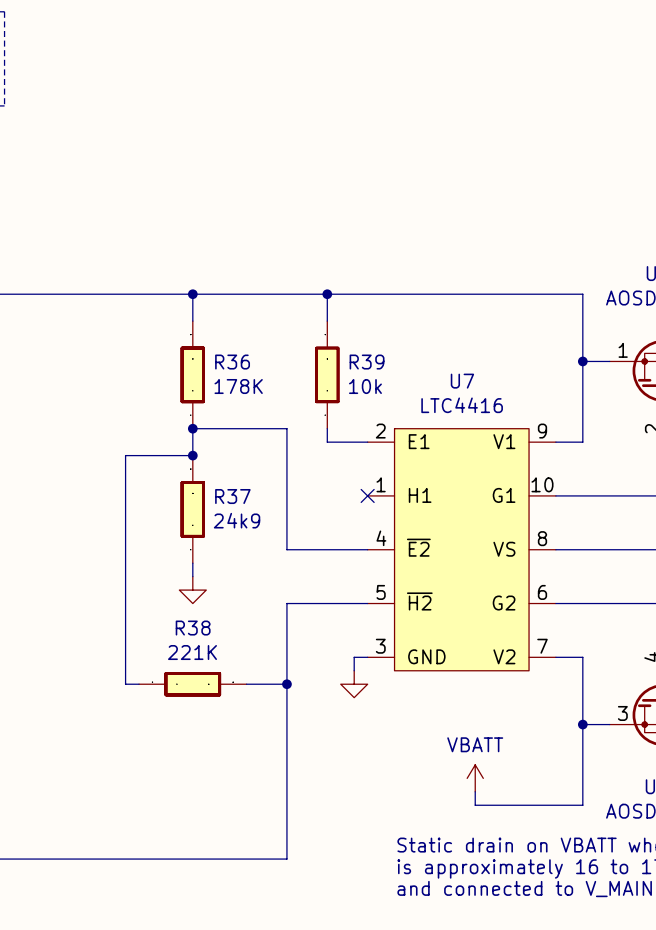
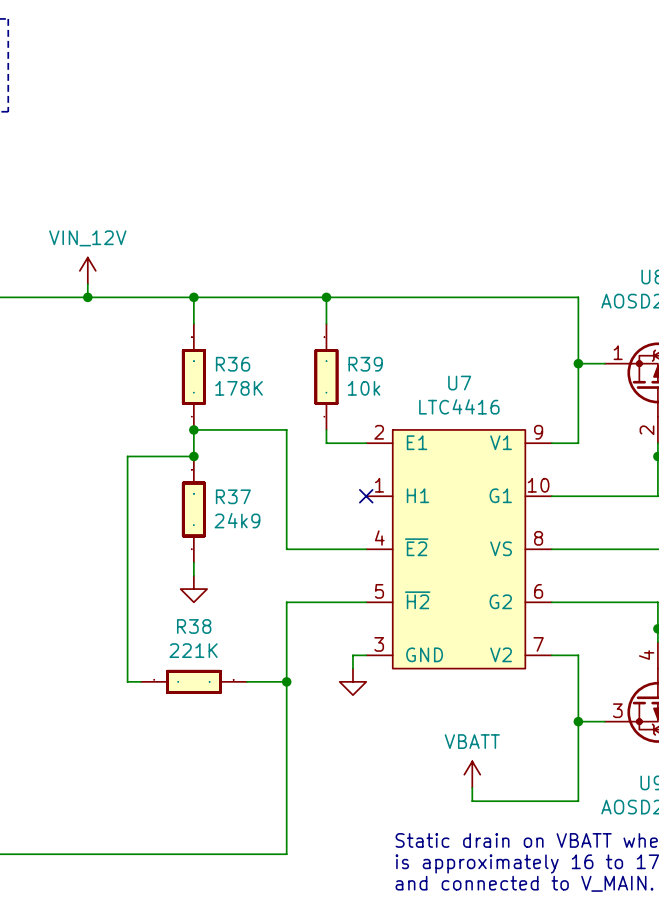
power symbol: none -> VIN_12V (87, 270)
wire: none -> (87, 284) (87, 297)
junction: none -> (87, 297)

